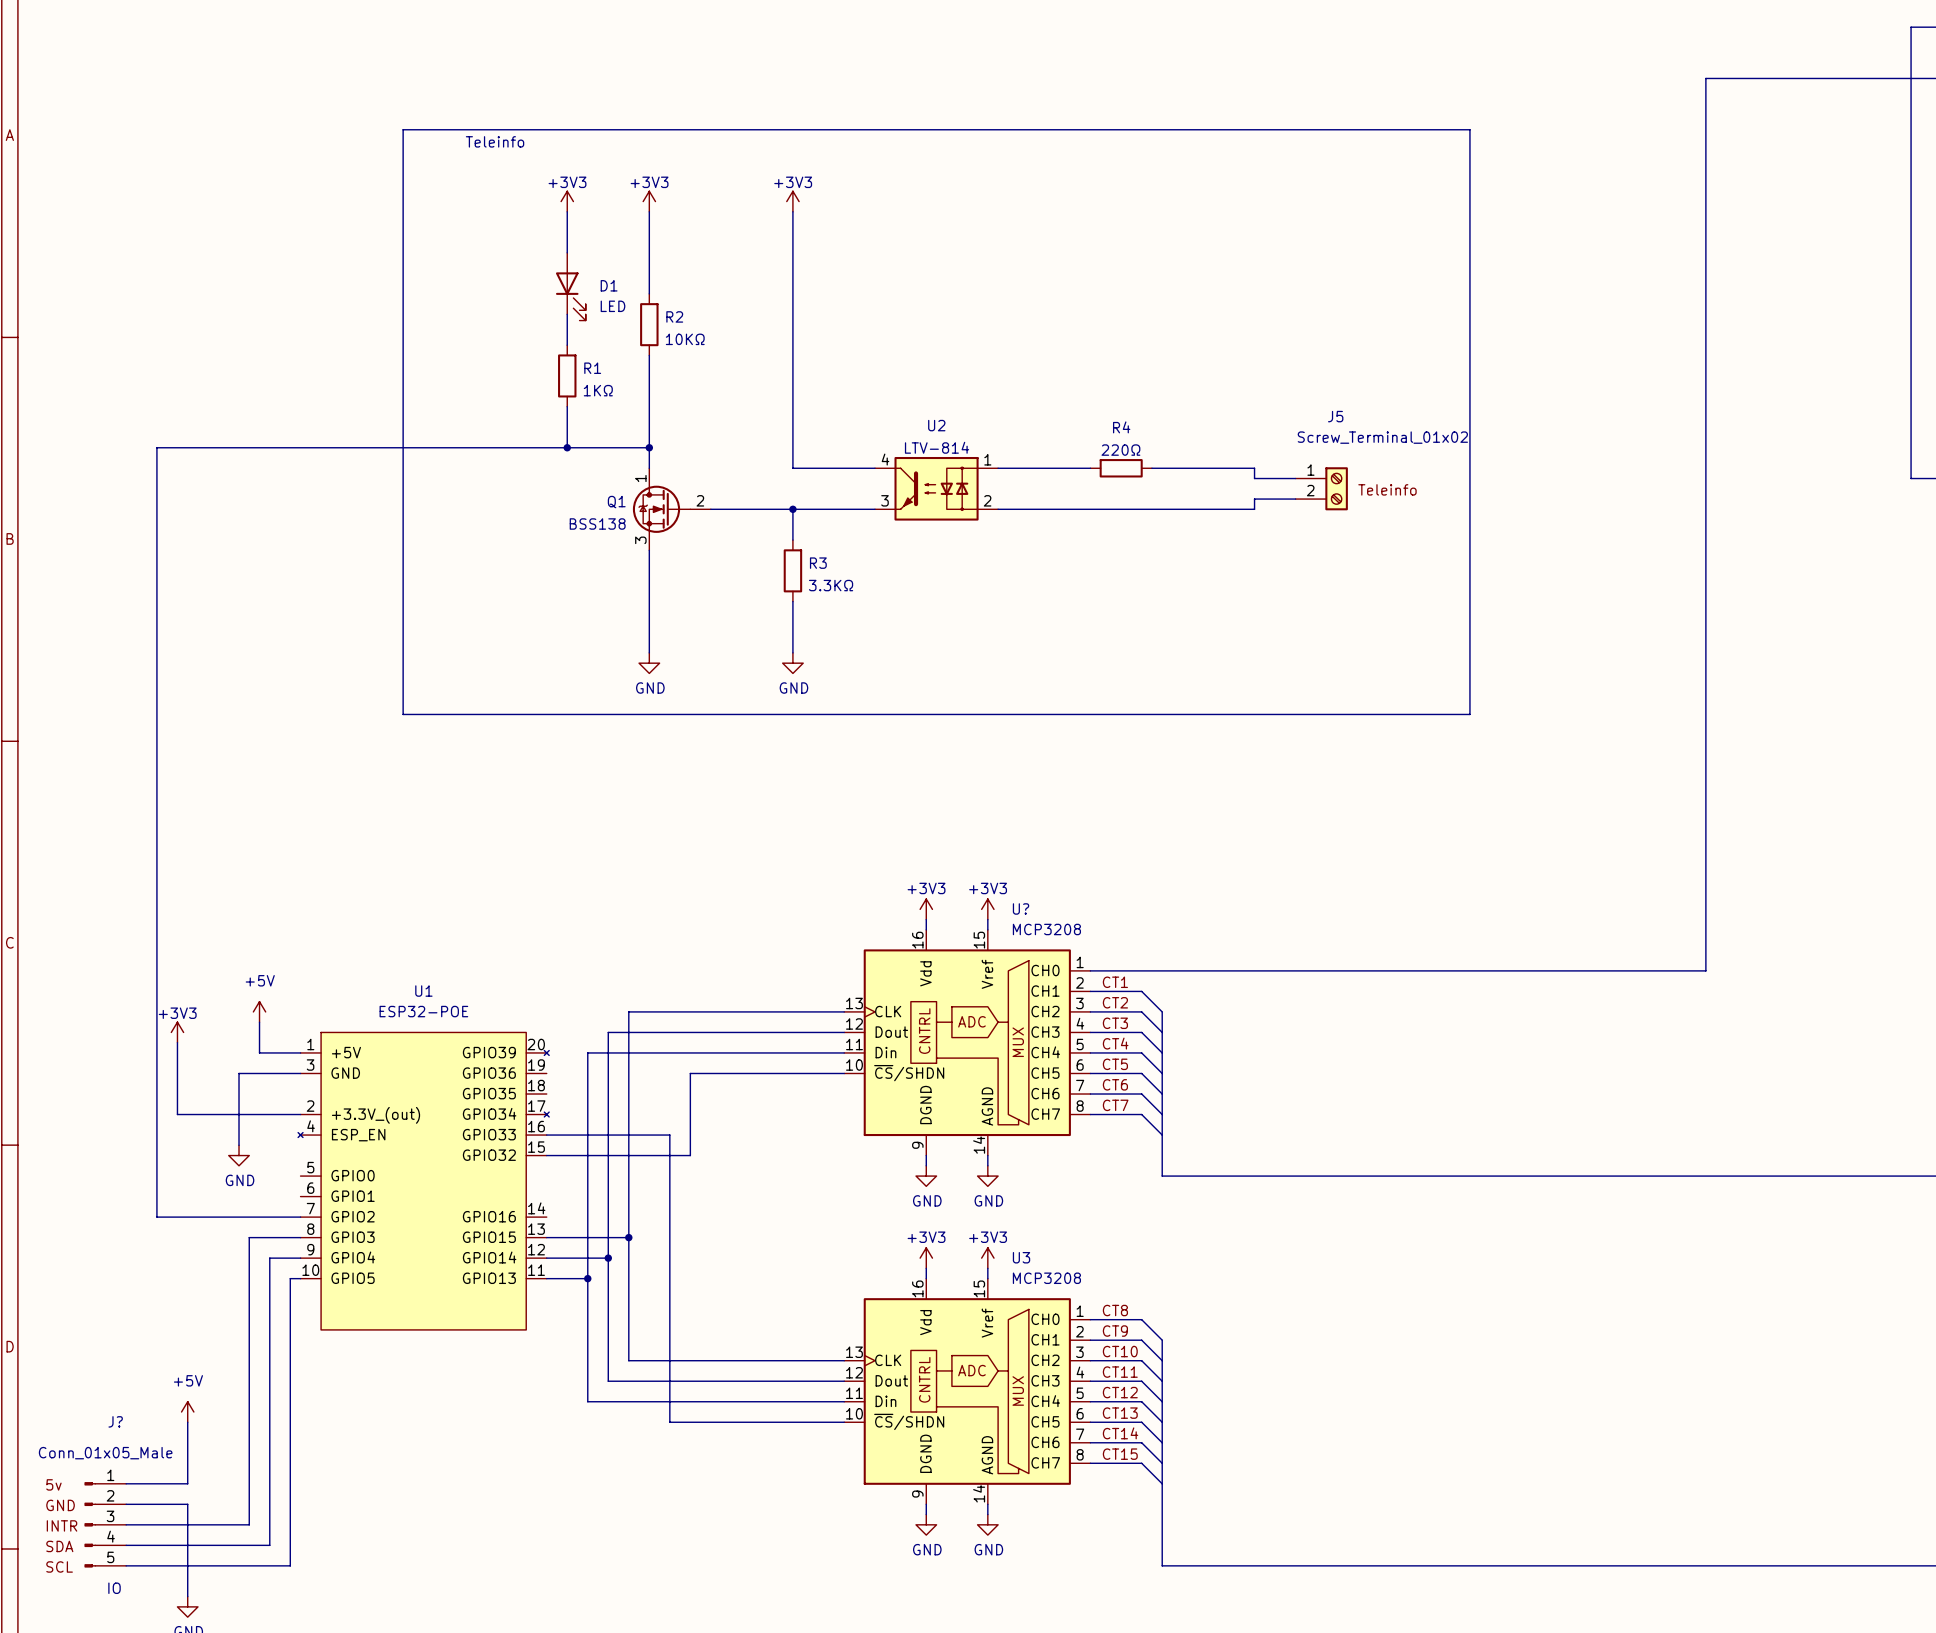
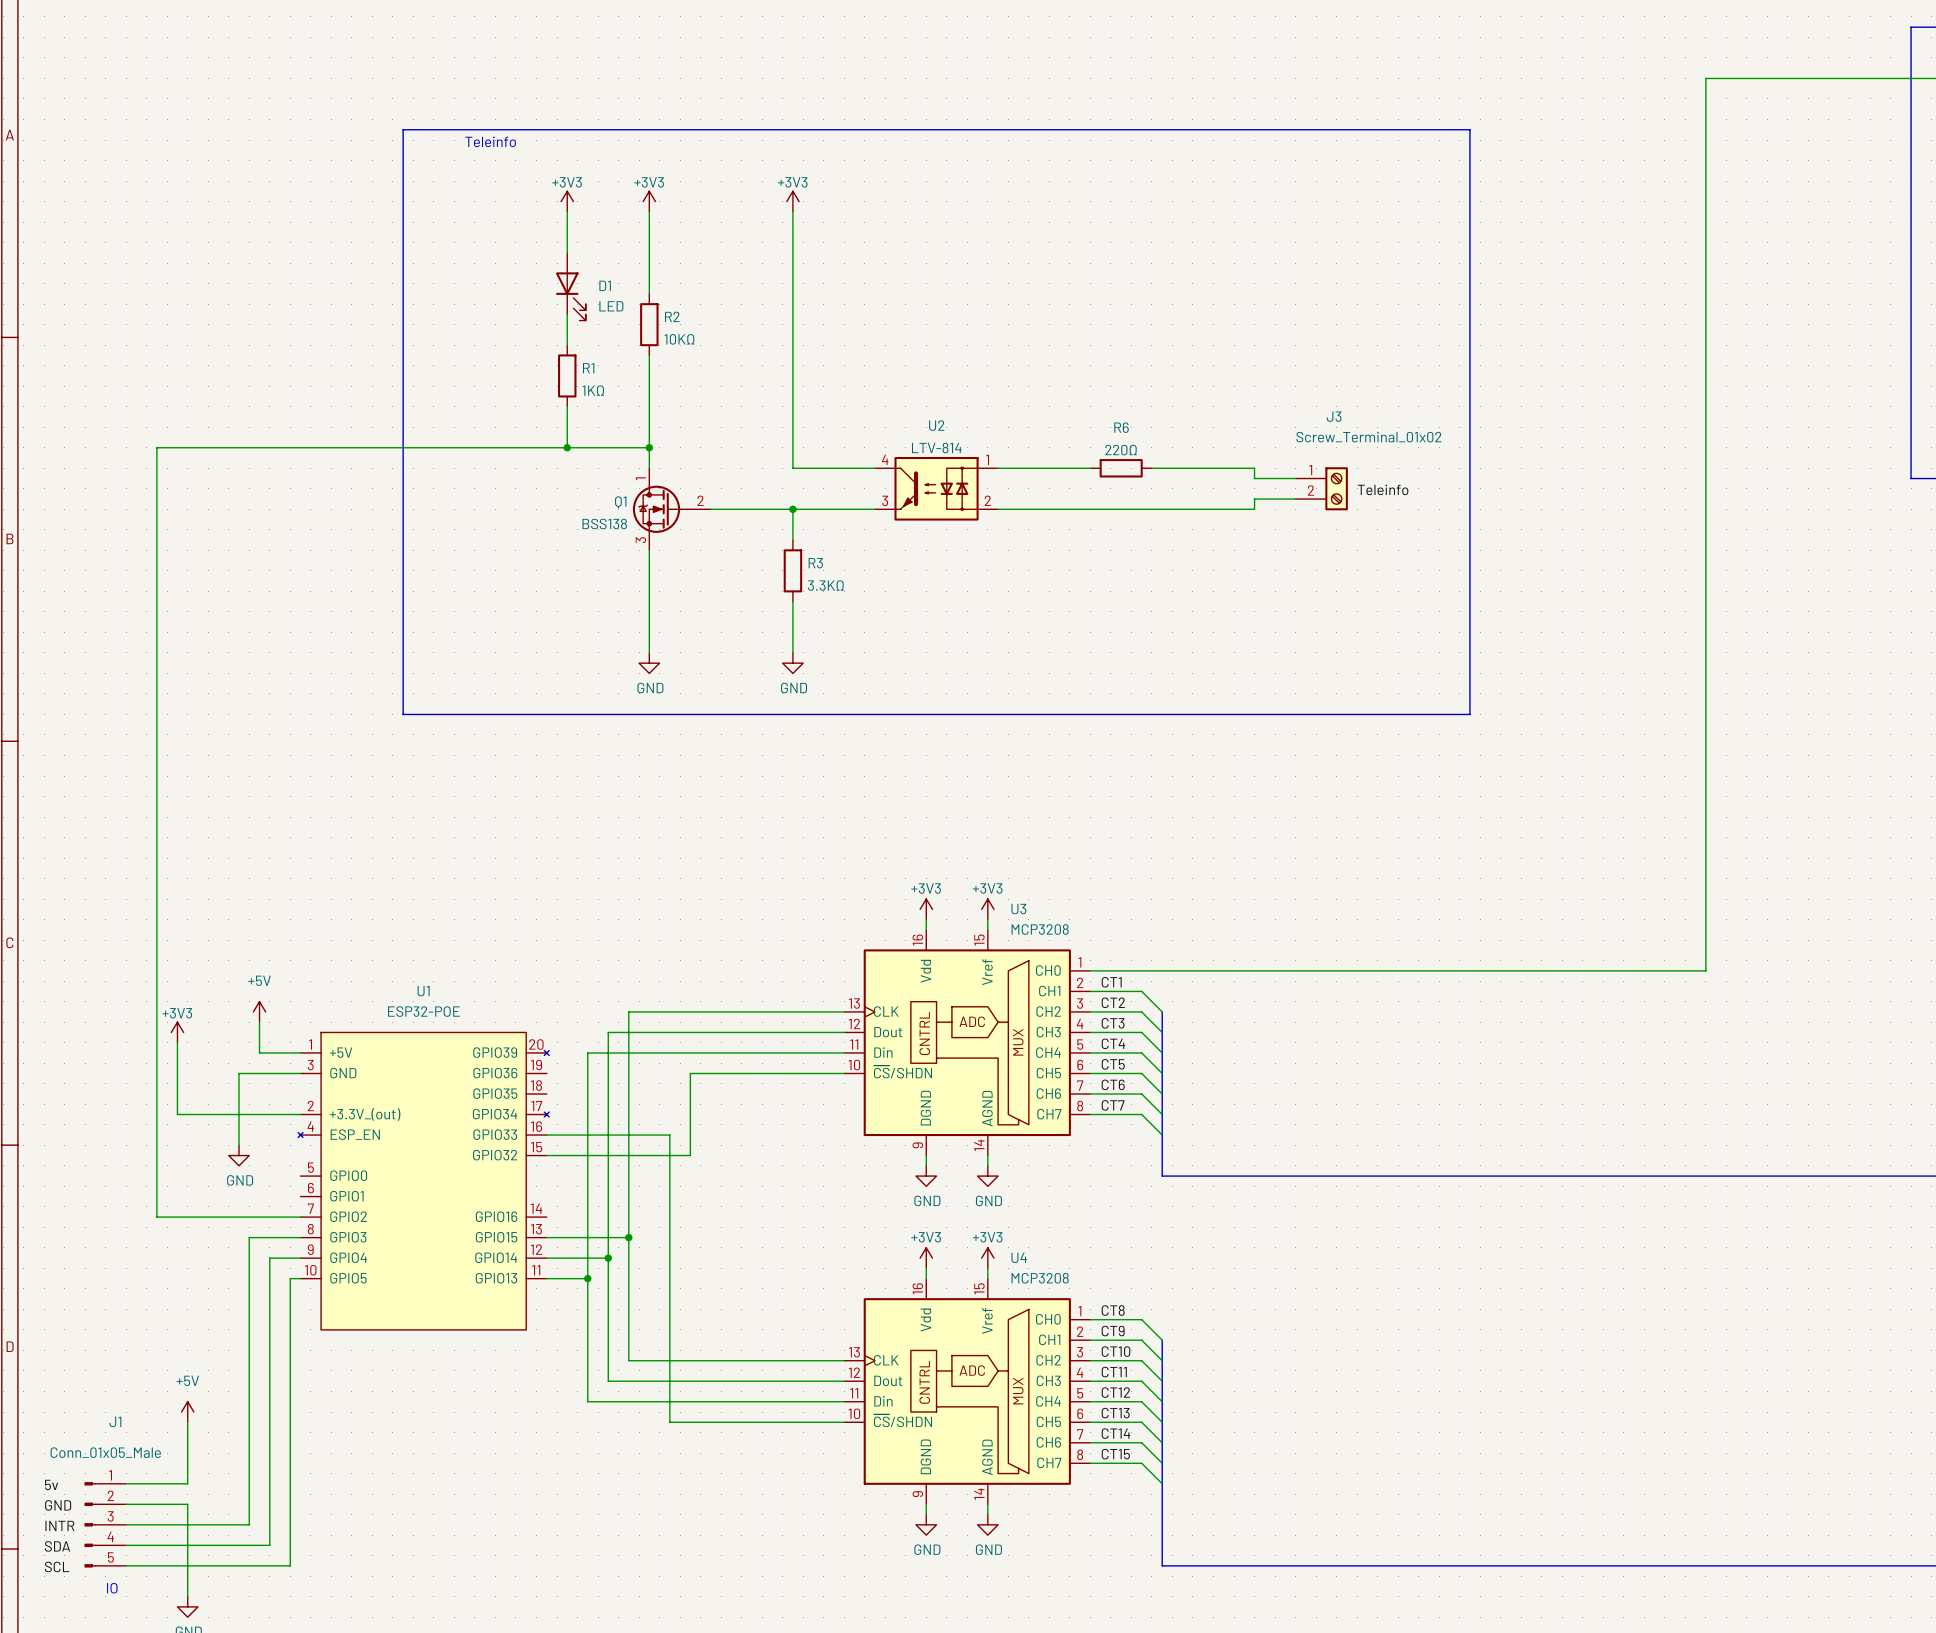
J5 name: J5 (1335, 416) -> J3 (1334, 416)
R4 name: R4 (1121, 427) -> R6 (1121, 427)
U? name: U? (1021, 908) -> U3 (1018, 909)
U3 name: U3 (1021, 1257) -> U4 (1019, 1257)
J? name: J? (115, 1421) -> J1 (115, 1421)

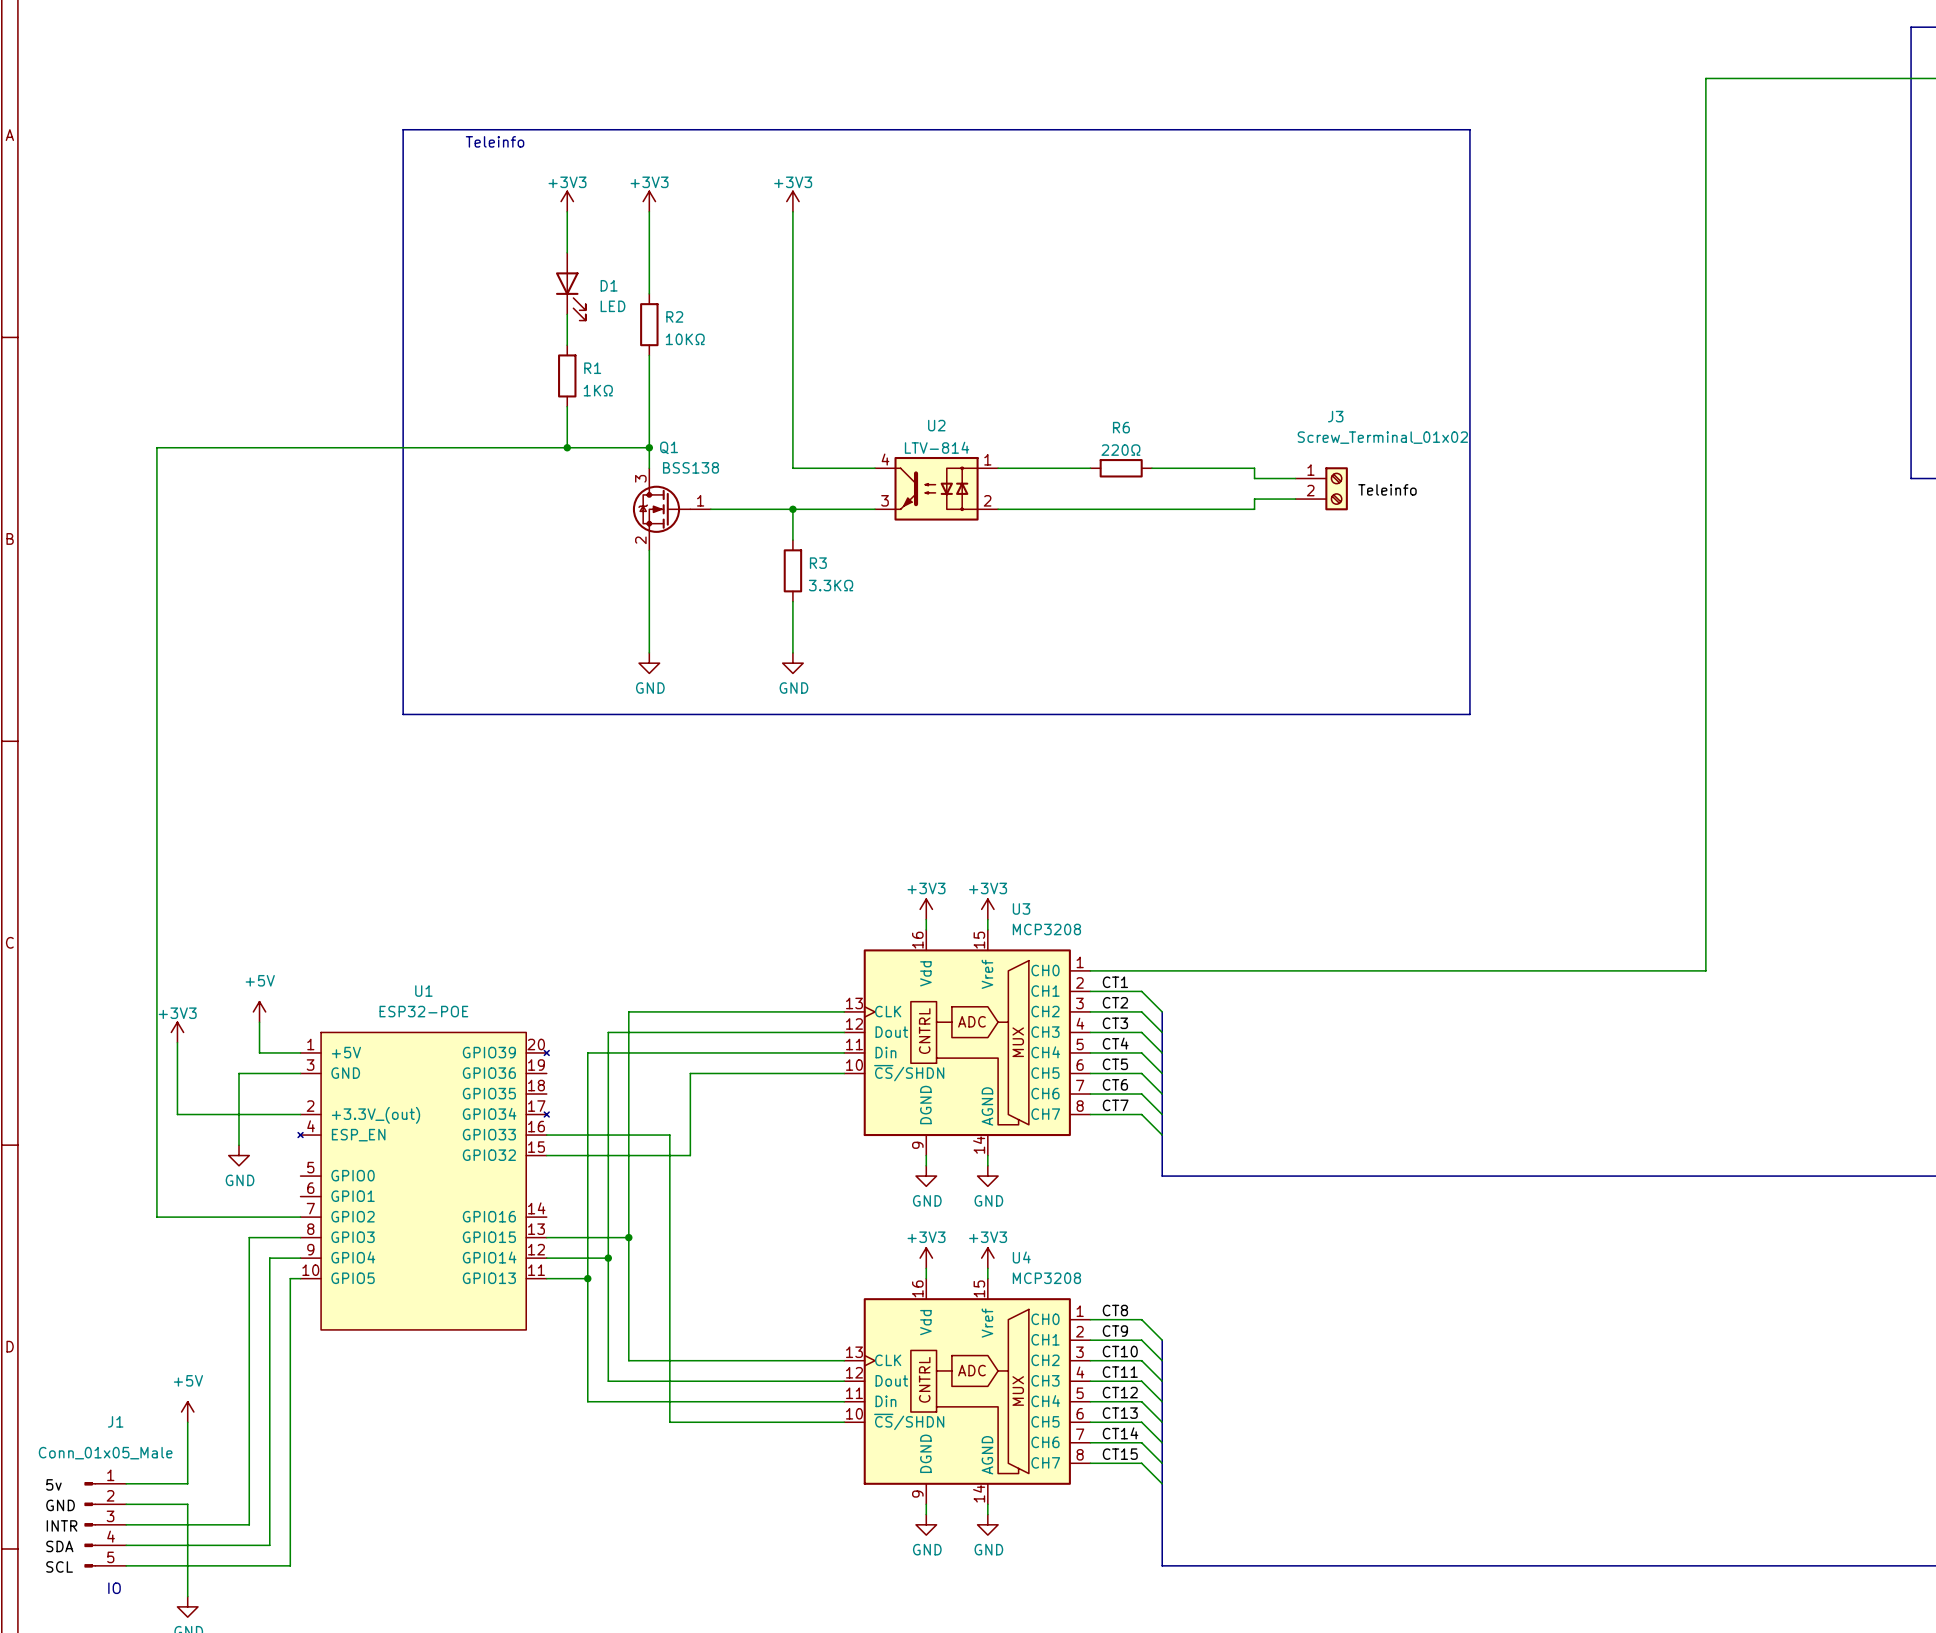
Q1 pin number: 1 (640, 478) -> 3 (640, 478)
Q1 pin number: 2 (700, 500) -> 1 (700, 500)
Q1 name position: Q1 (620, 502) -> Q1 (669, 447)
Q1 value position: BSS138 (604, 523) -> BSS138 (691, 467)
Q1 pin number: 3 (640, 540) -> 2 (640, 540)

